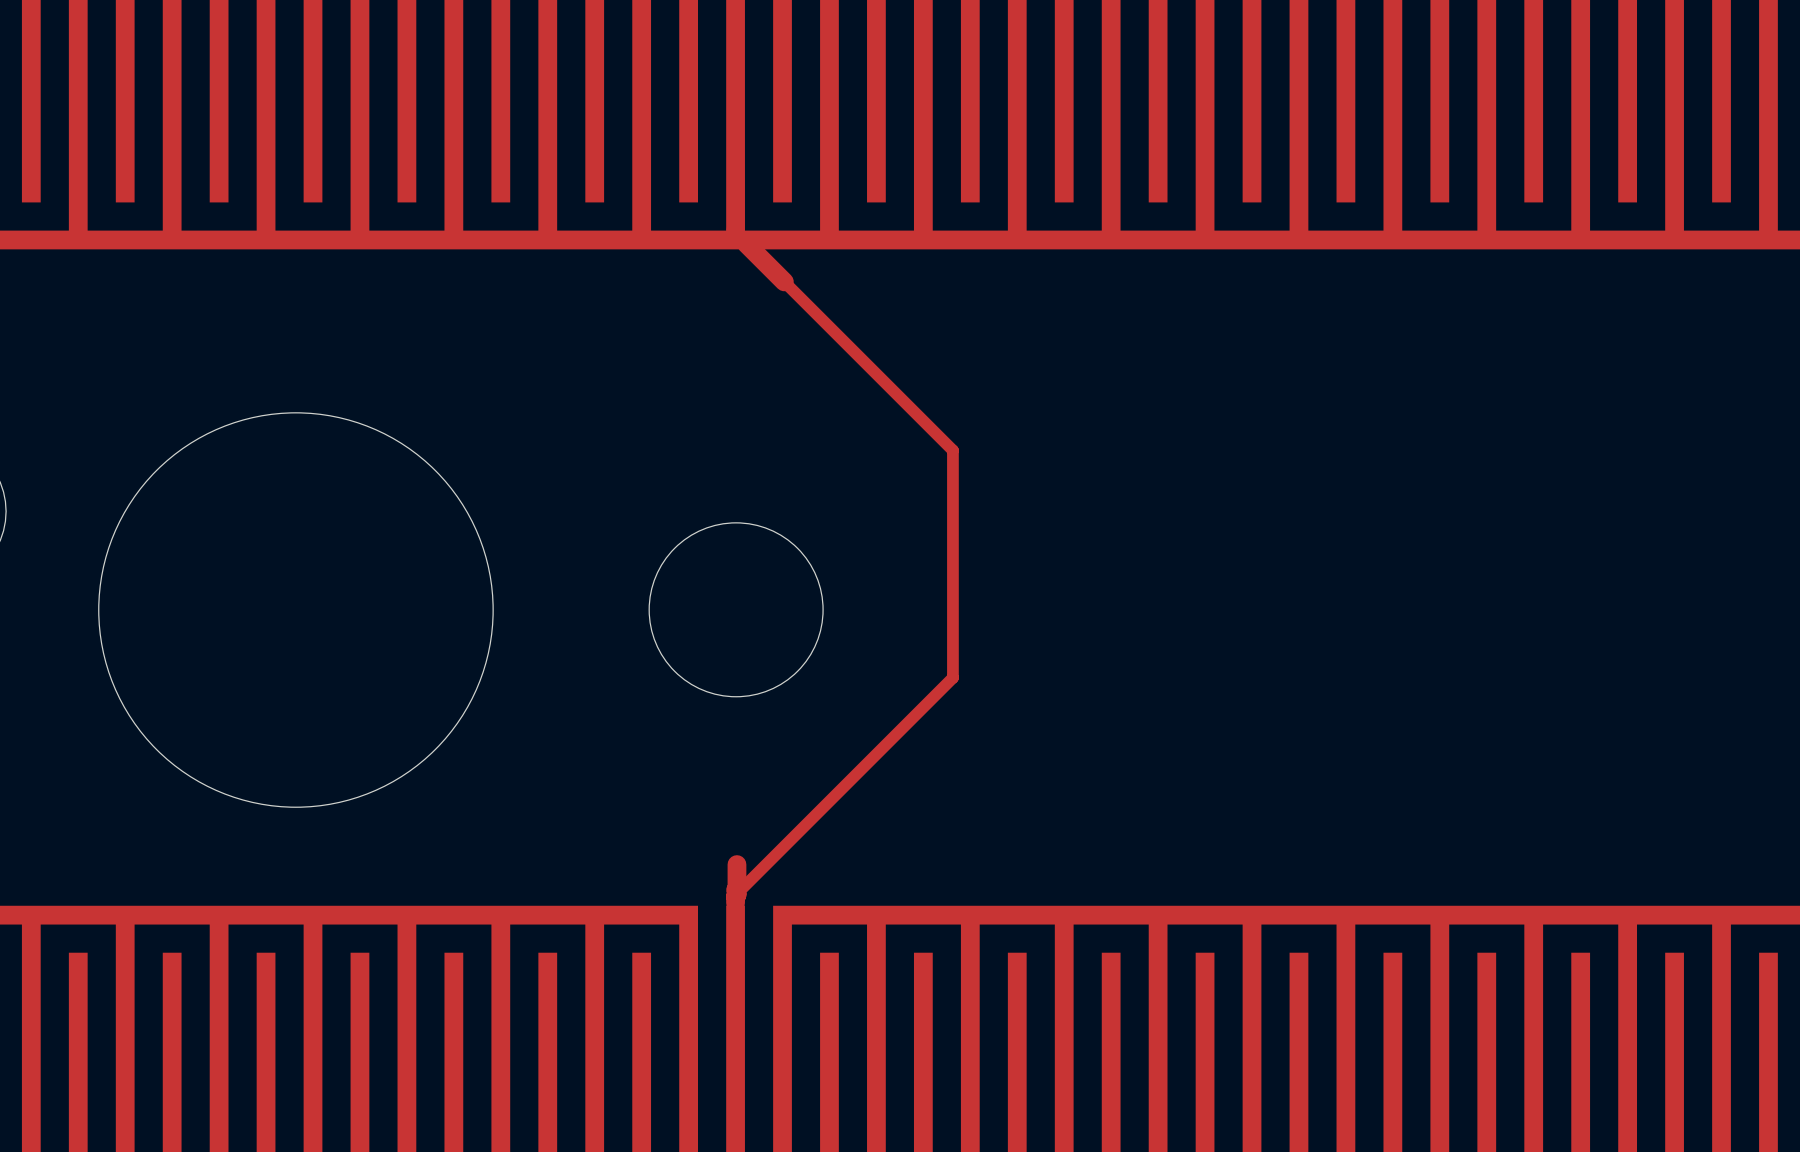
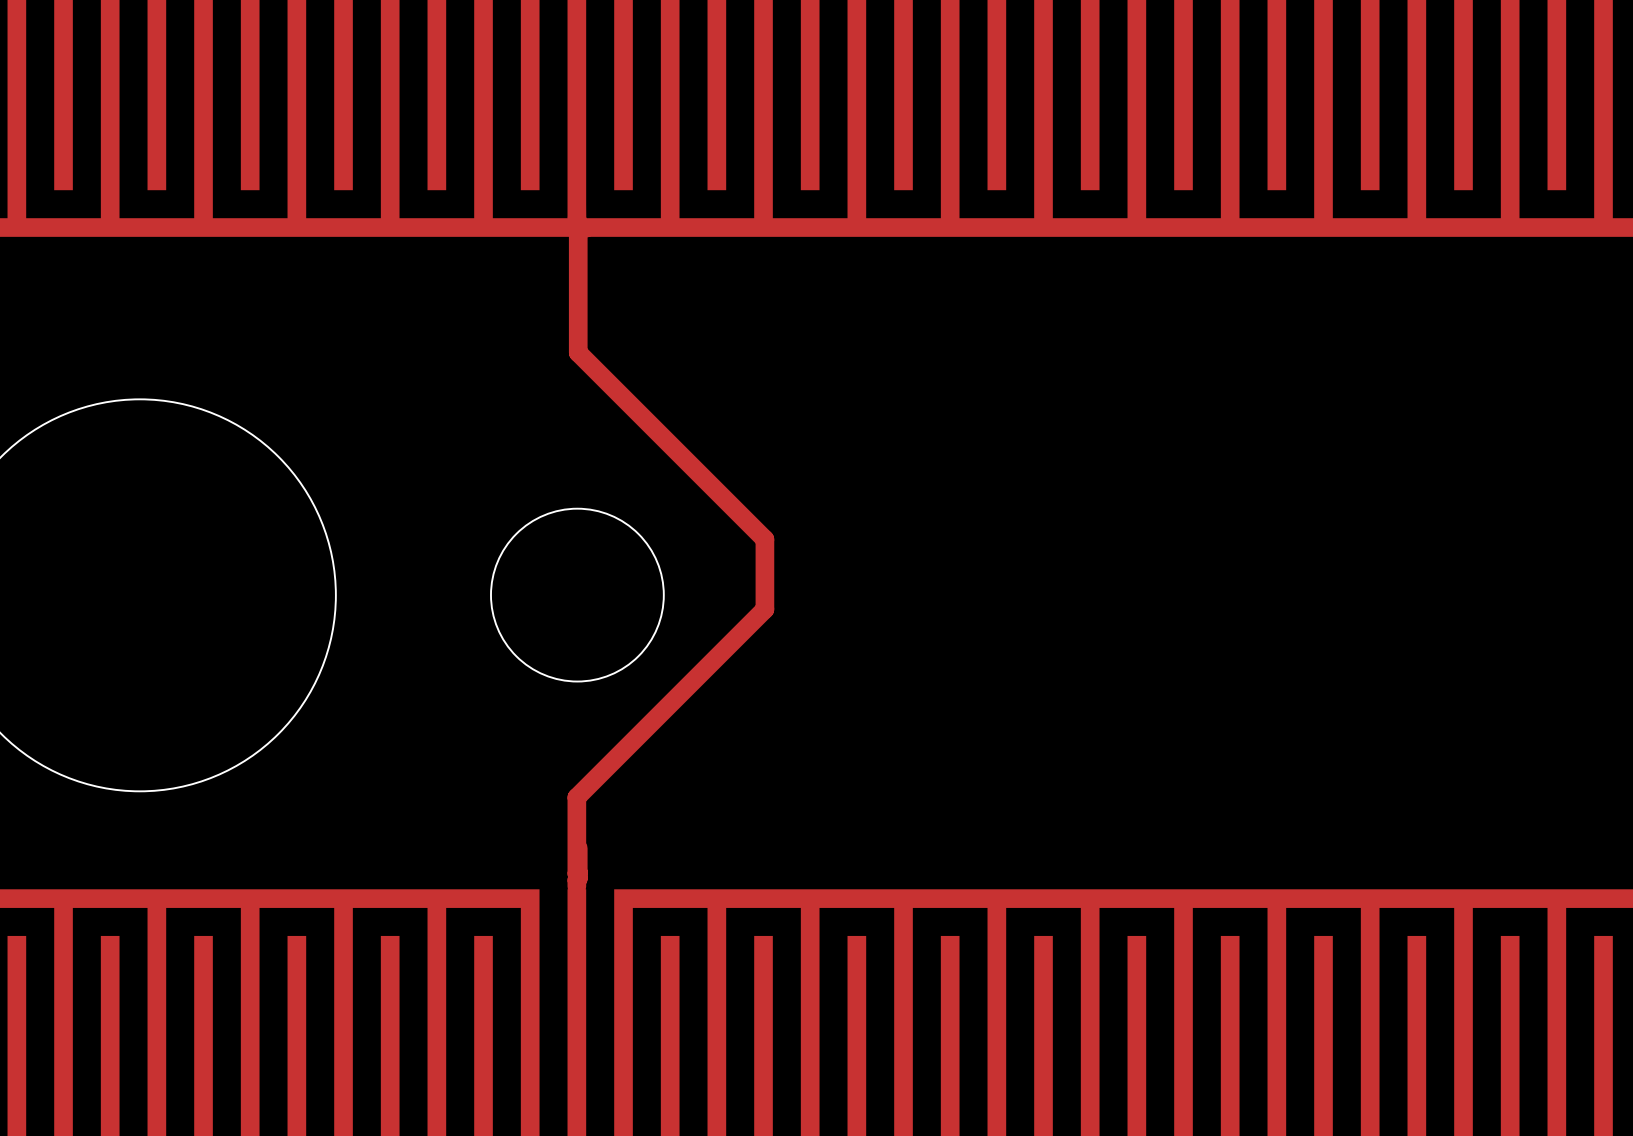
track: none -> (578, 222) (578, 352) (764, 539) (764, 609) (576, 797) (576, 873)
track: (784, 281) (746, 243) (952, 450) (952, 677) (736, 893) -> none

